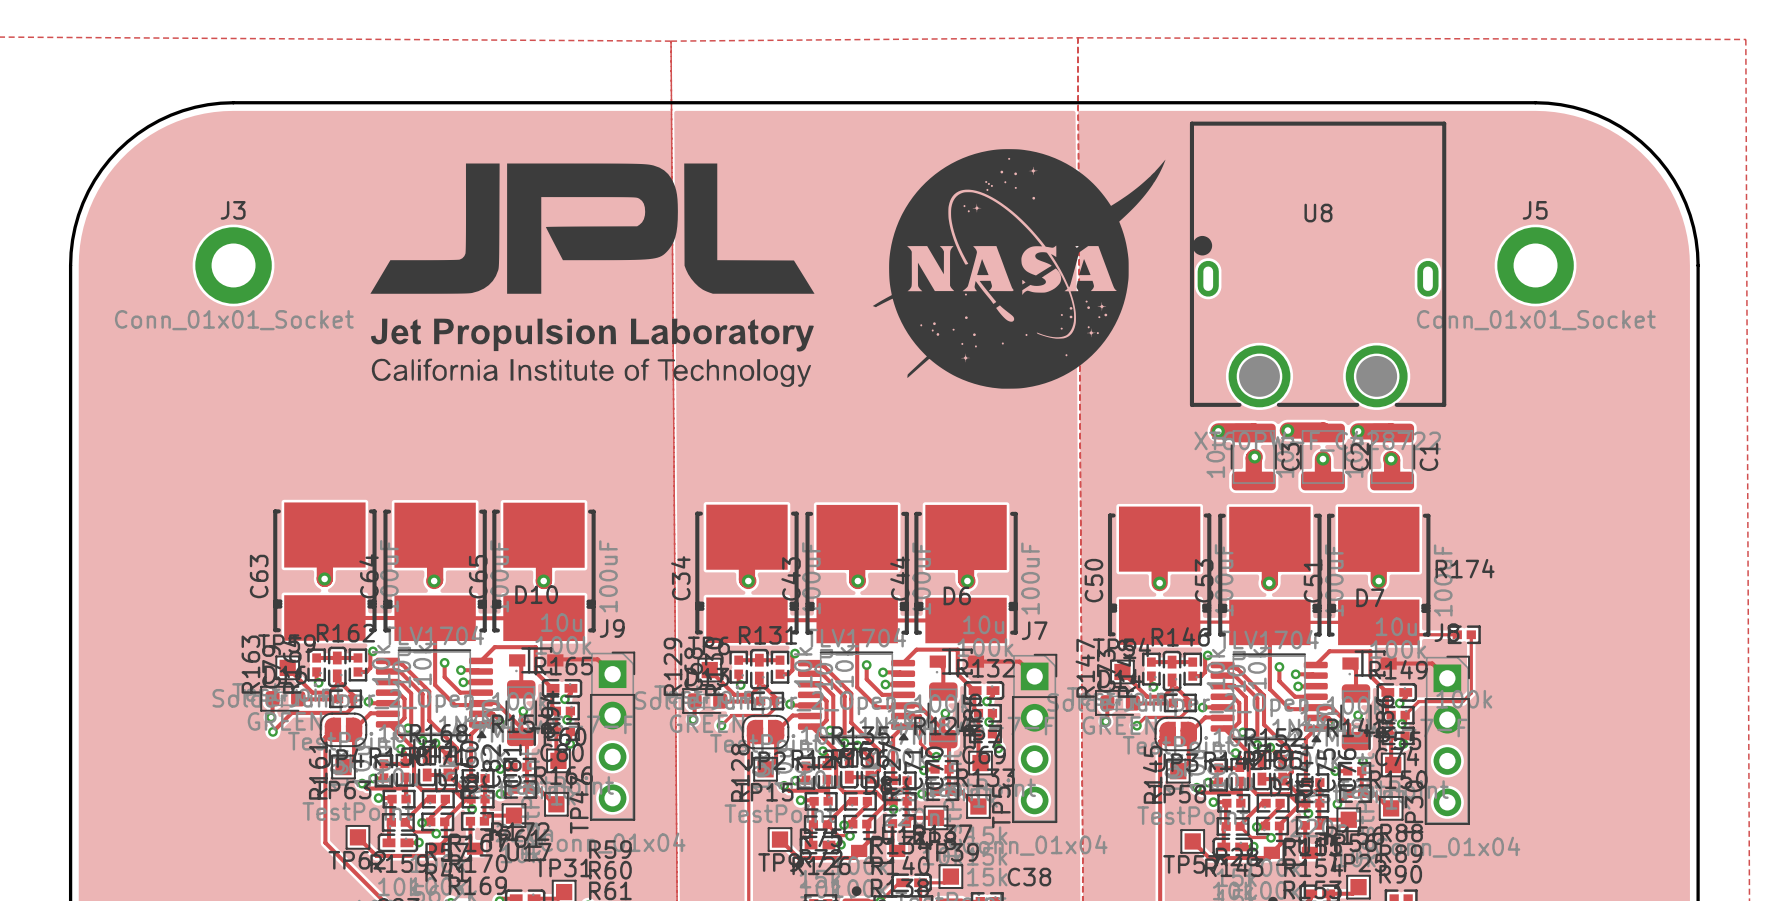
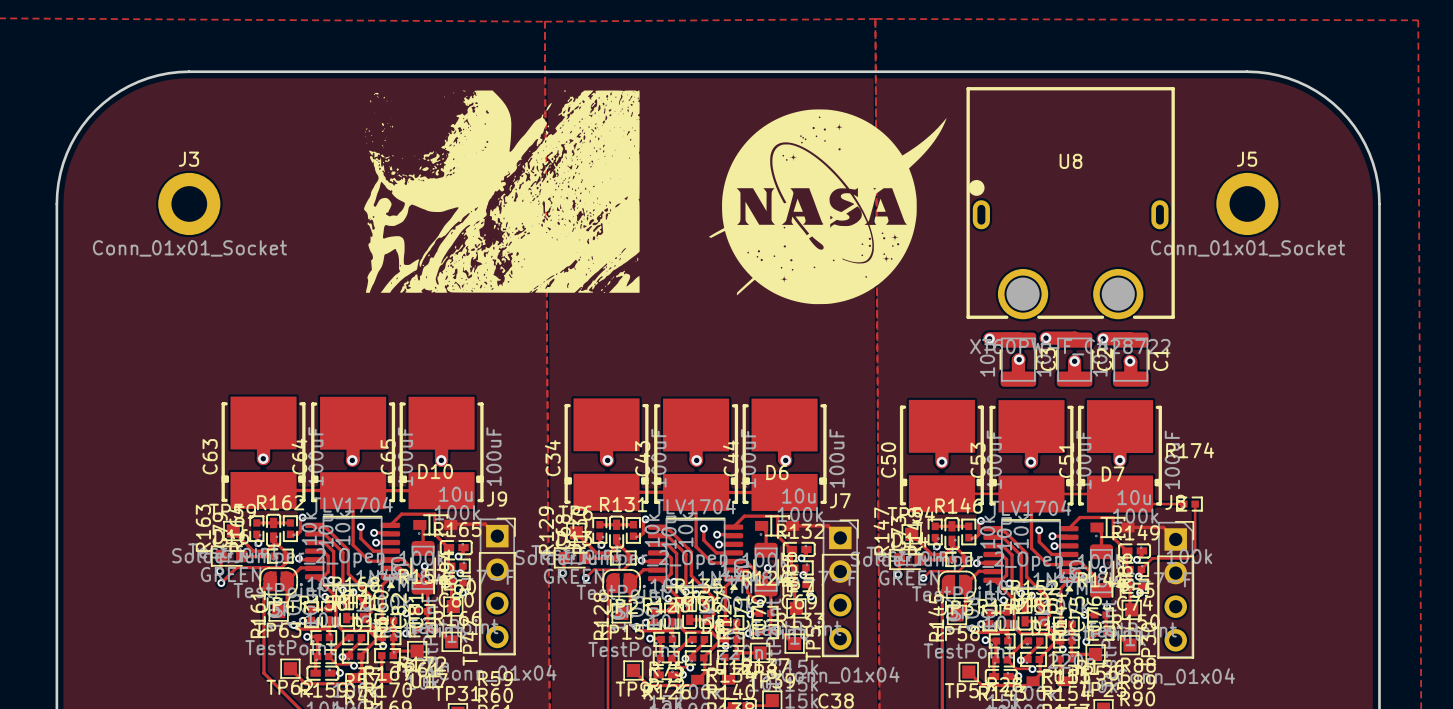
drawing: [370, 163, 815, 387] -> none
part: none -> (501, 191)

